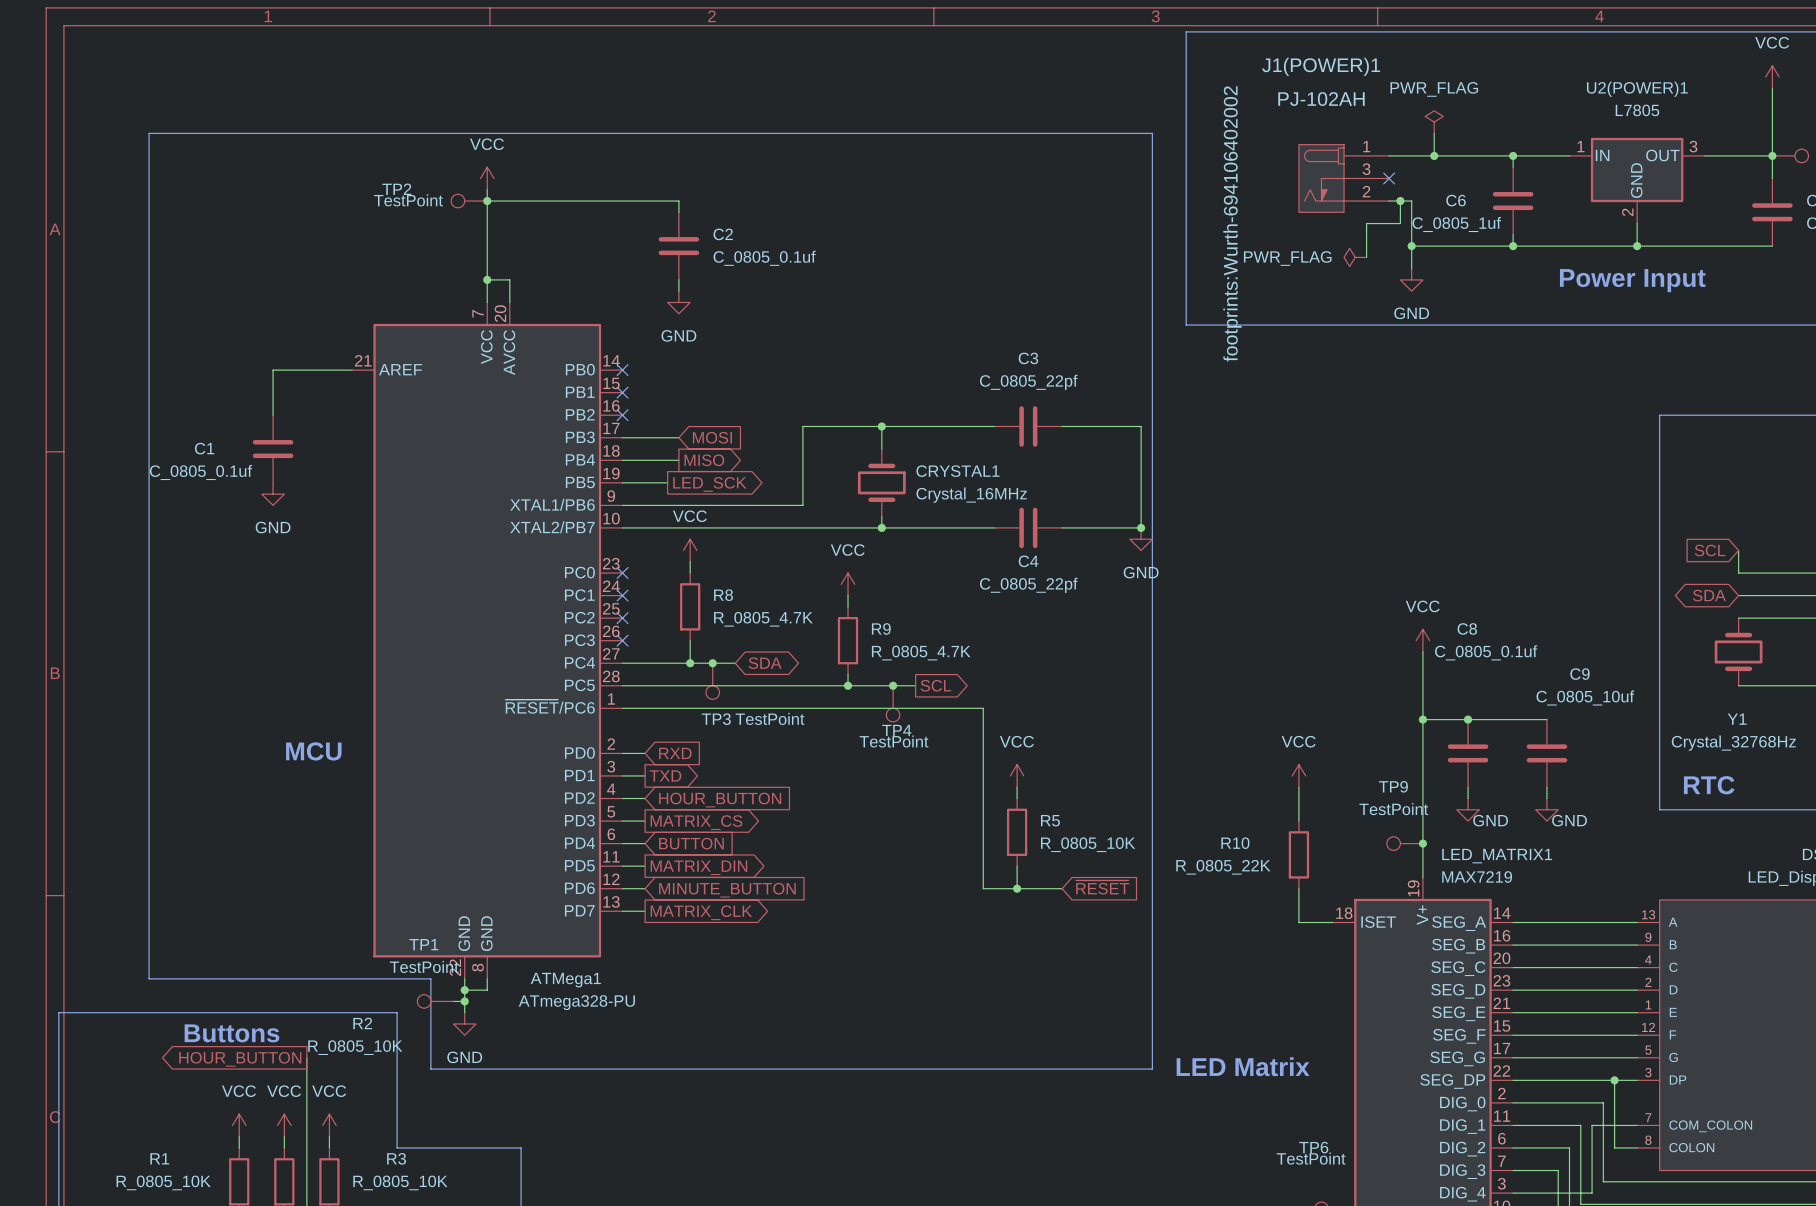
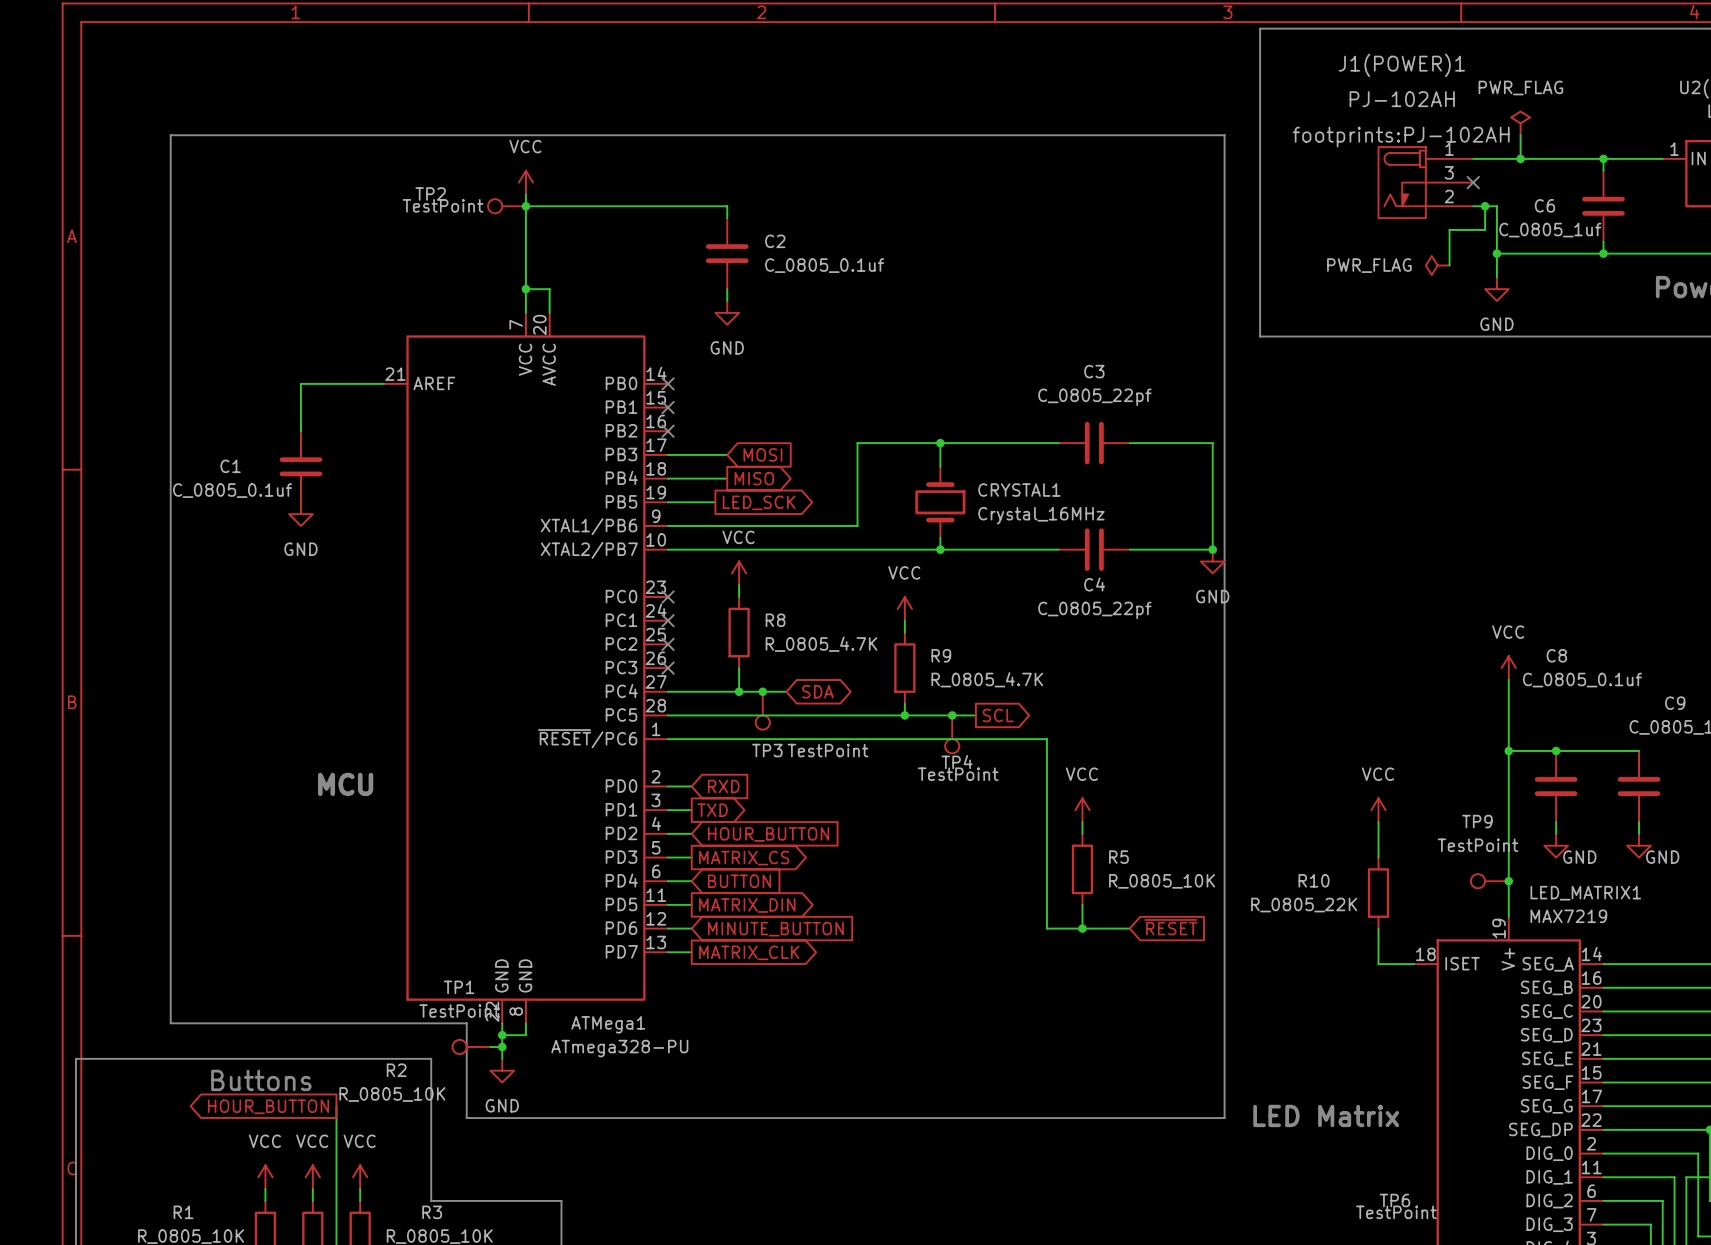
J1(POWER)1 text: footprints:Wurth-694106402002 (1232, 223) -> footprints:PJ-102AH (1401, 137)

